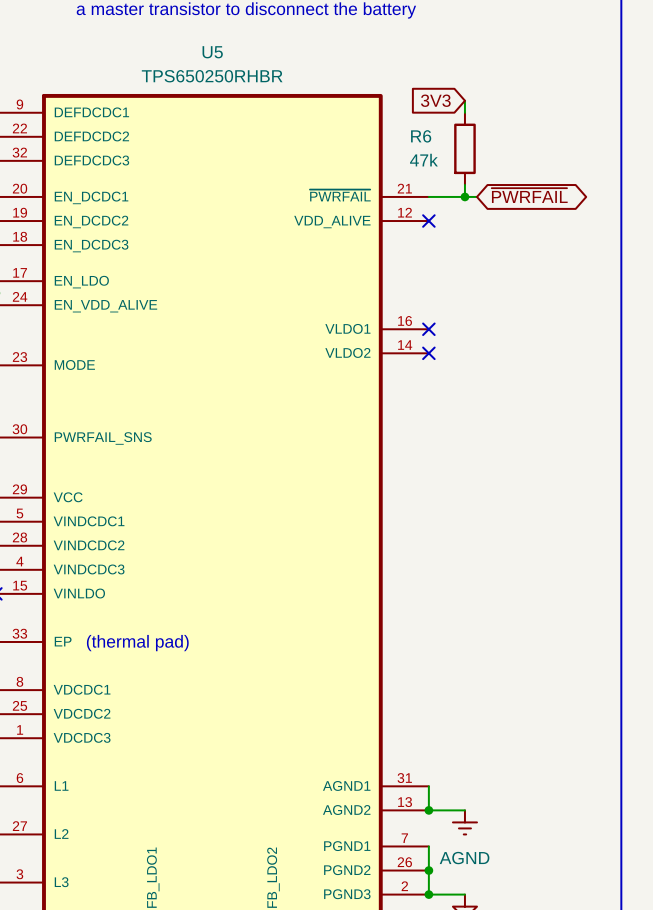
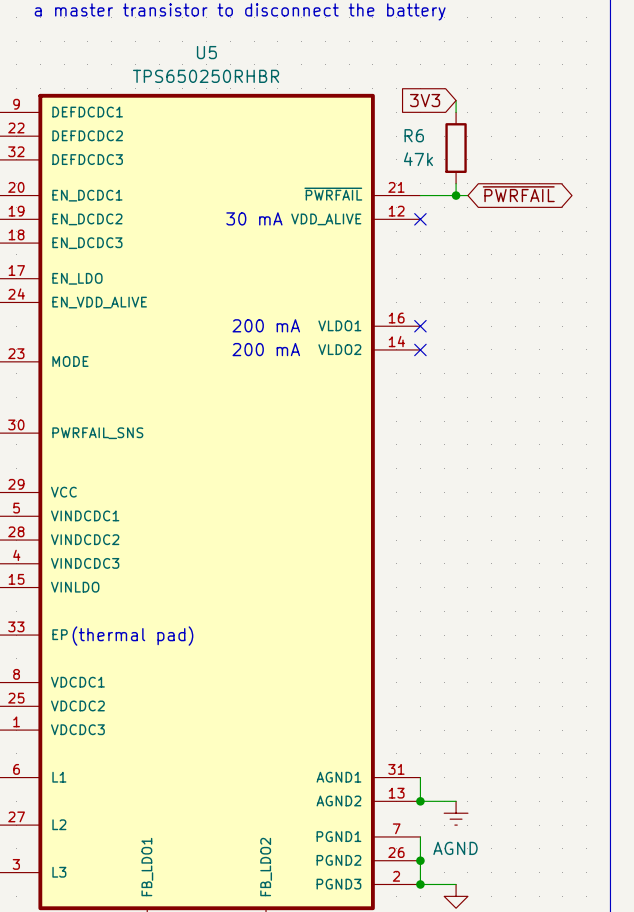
text: none -> 30 mA (254, 218)
text: none -> 200 mA (266, 325)
text: none -> 200 mA (266, 349)

